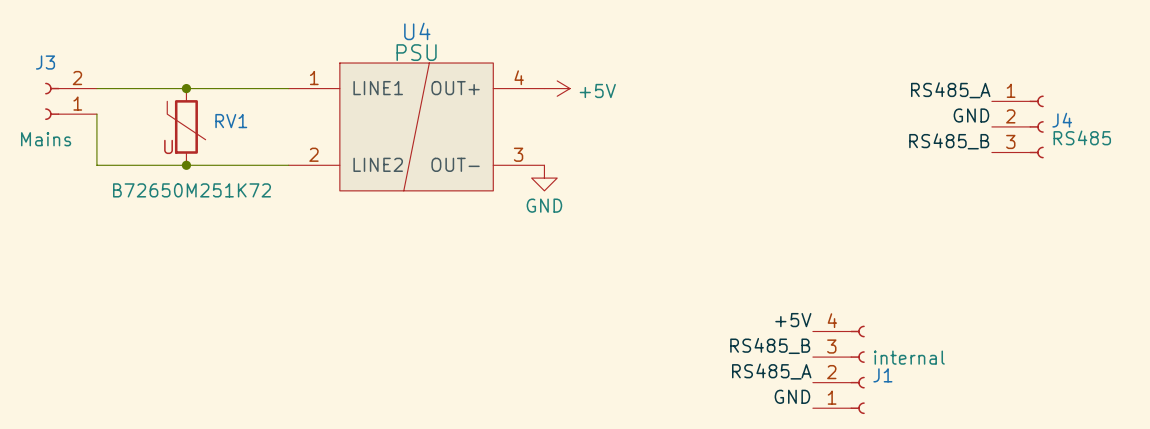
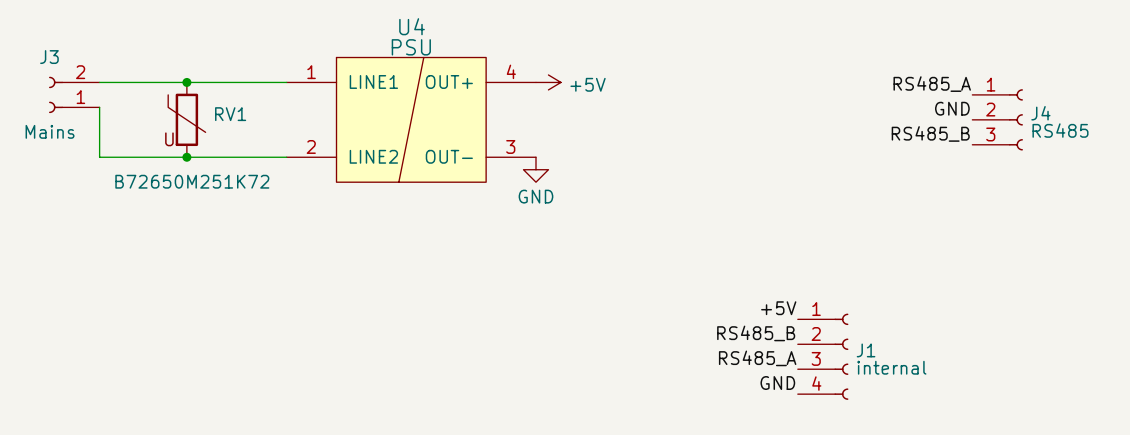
J1 flip: as is (857, 369) -> up-down (841, 356)

